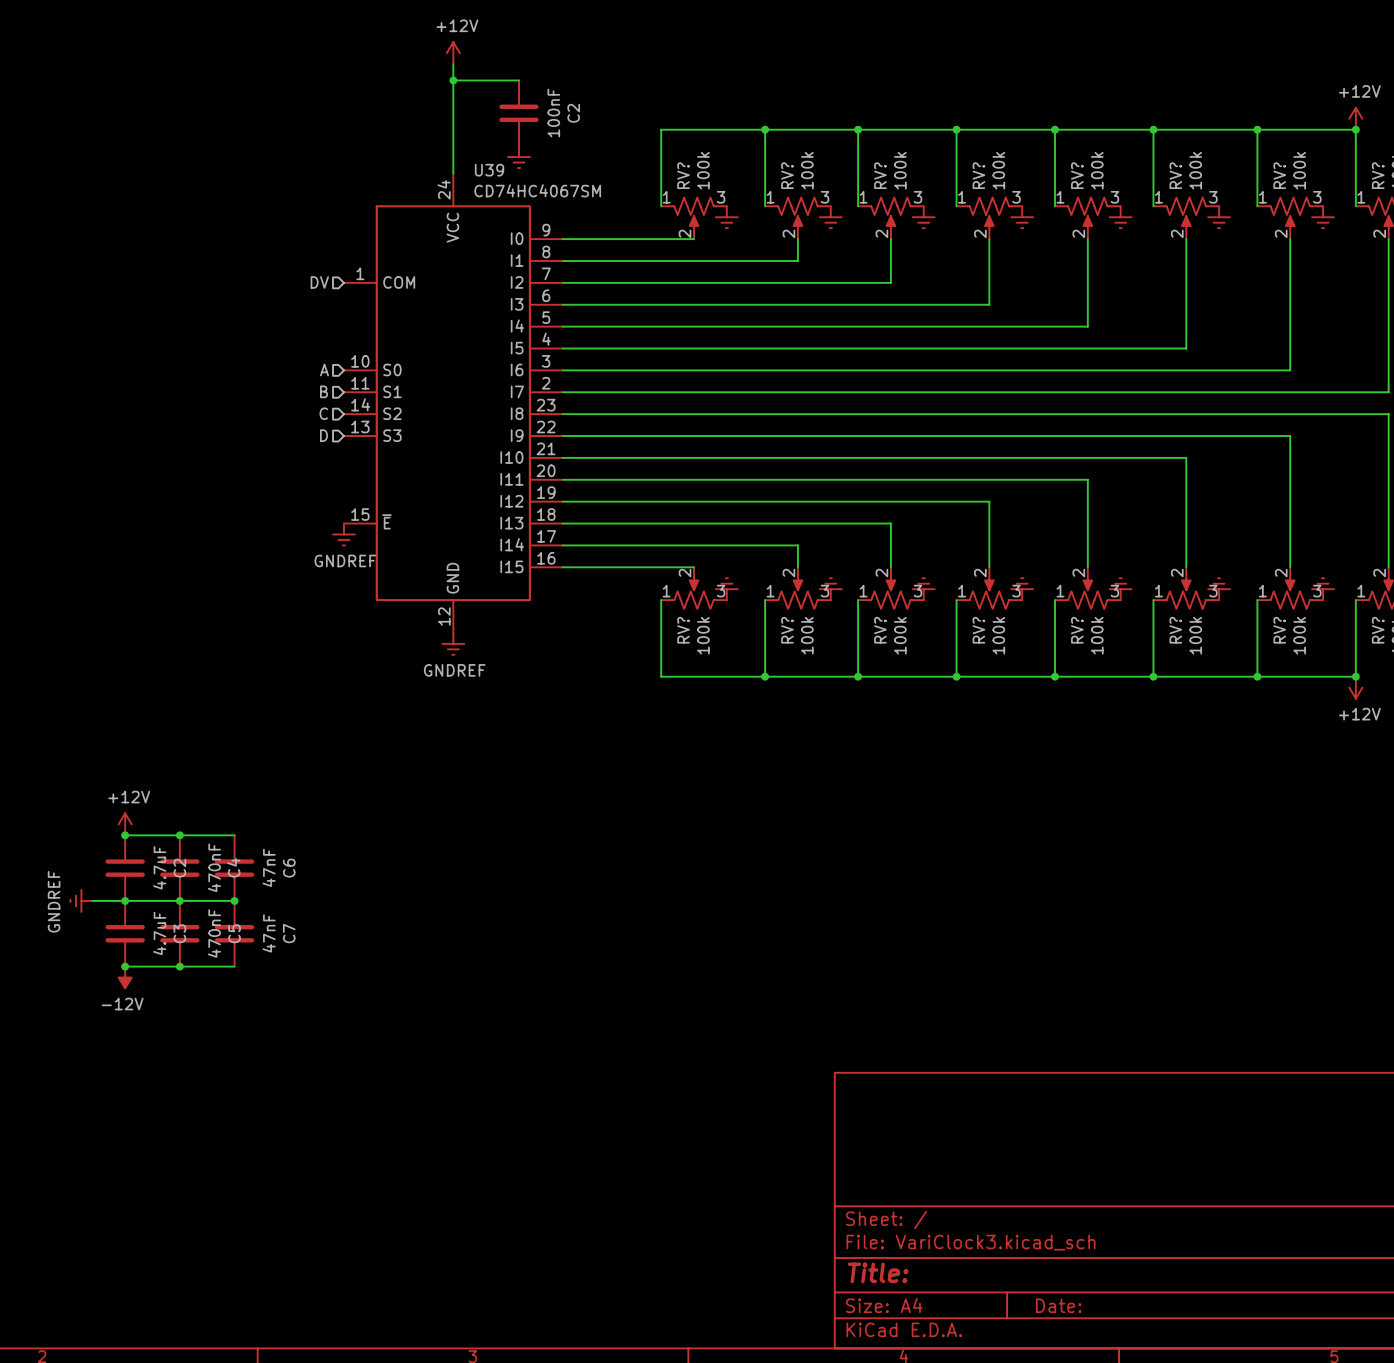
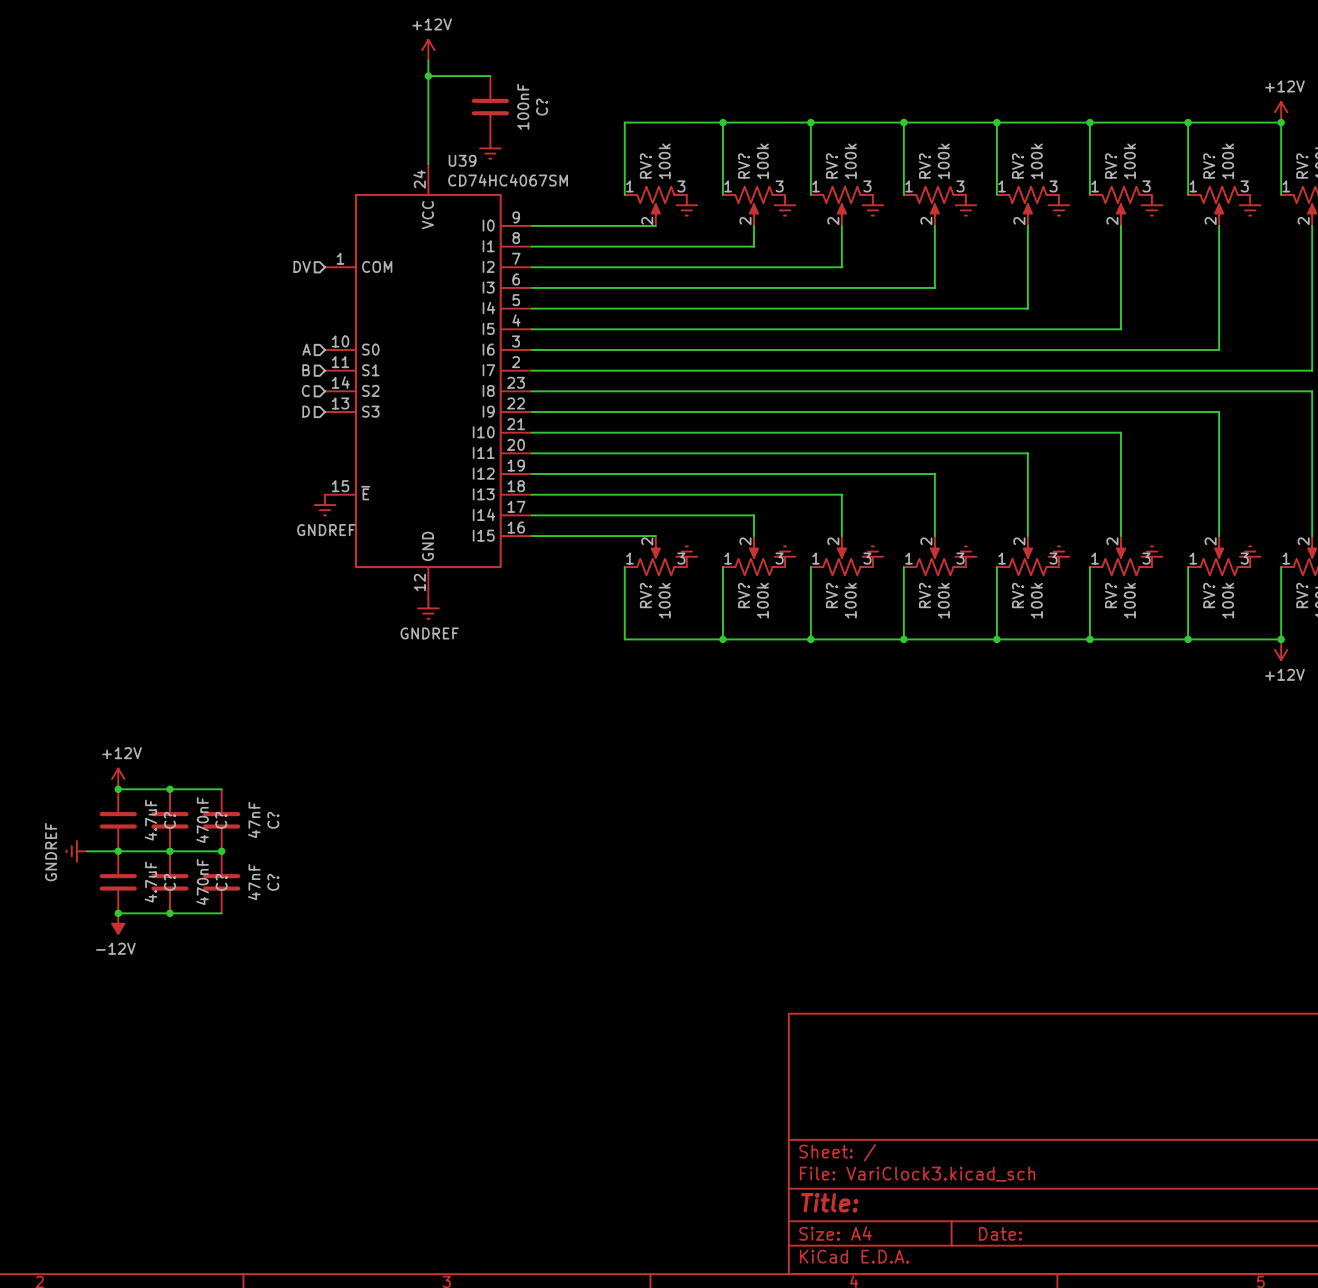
C2 name: C2 (573, 113) -> C? (542, 107)
C4 name: C4 (233, 867) -> C? (221, 820)
C2 name: C2 (179, 868) -> C? (169, 820)
C6 name: C6 (289, 868) -> C? (273, 820)
C3 name: C3 (179, 933) -> C? (169, 882)
C5 name: C5 (234, 933) -> C? (221, 882)
C7 name: C7 (289, 933) -> C? (273, 882)

